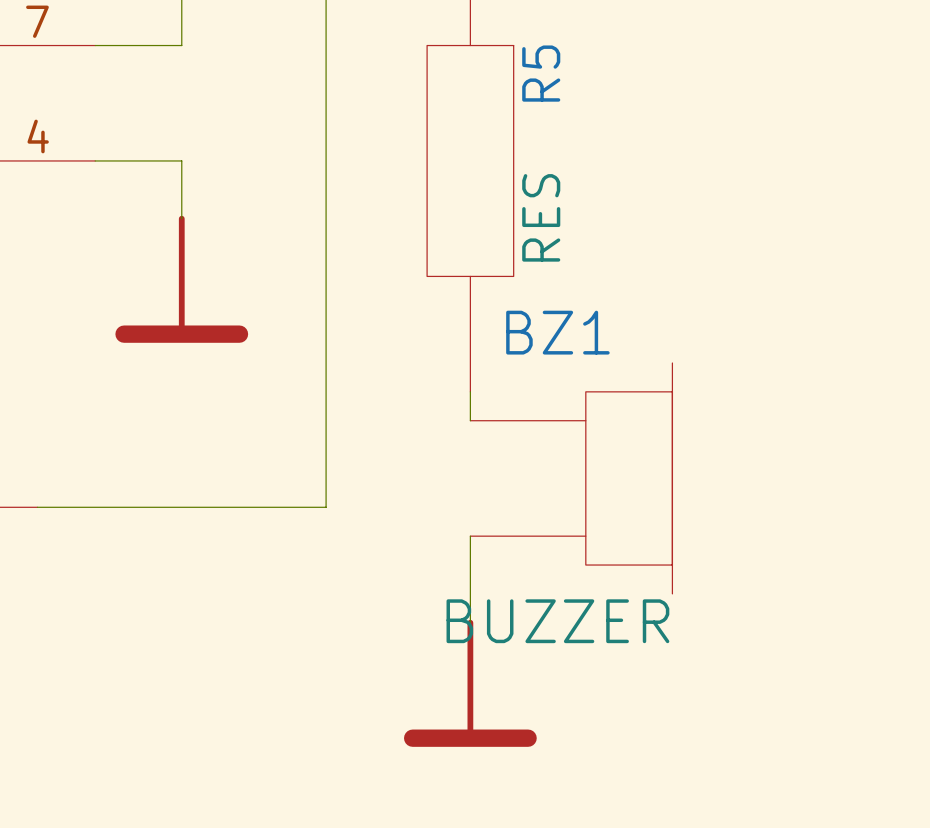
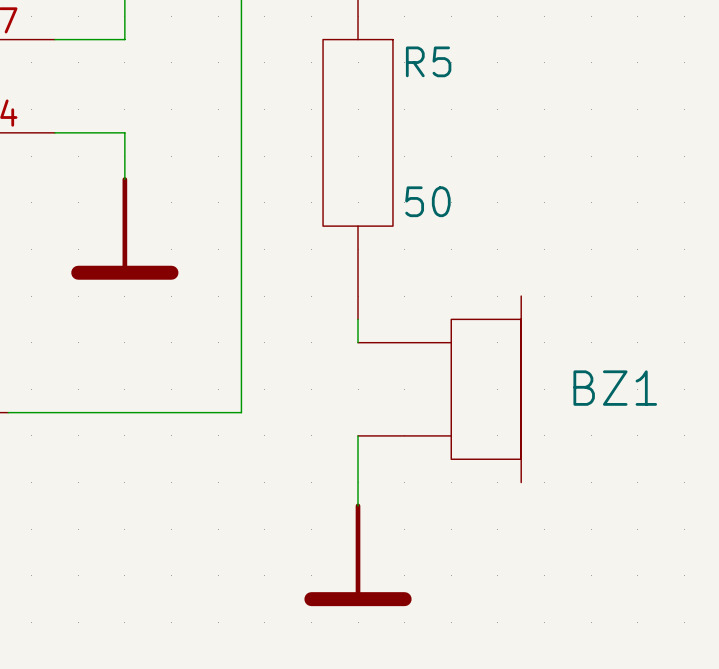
R5 name rotation: 0° (541, 73) -> 90° clockwise (428, 61)
R5 value: RES (541, 217) -> 50 (427, 201)
BZ1 name position: BZ1 (557, 332) -> BZ1 (615, 388)
BZ1 value: BUZZER (557, 621) -> none

